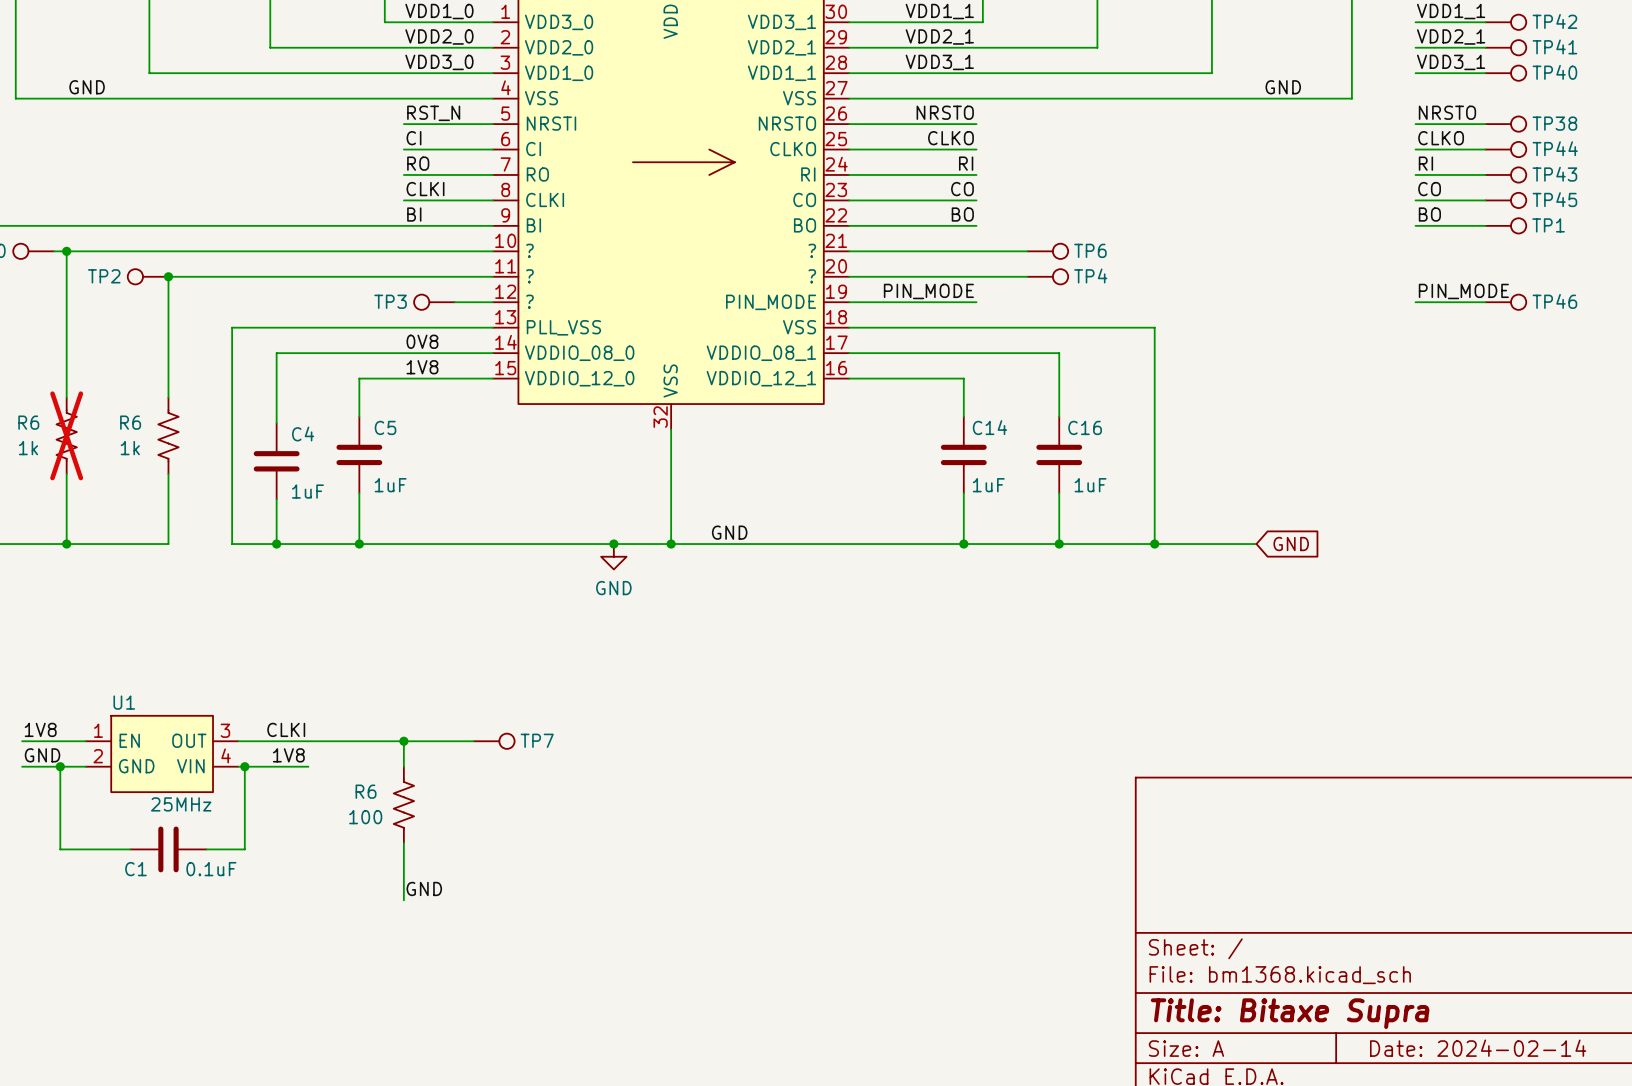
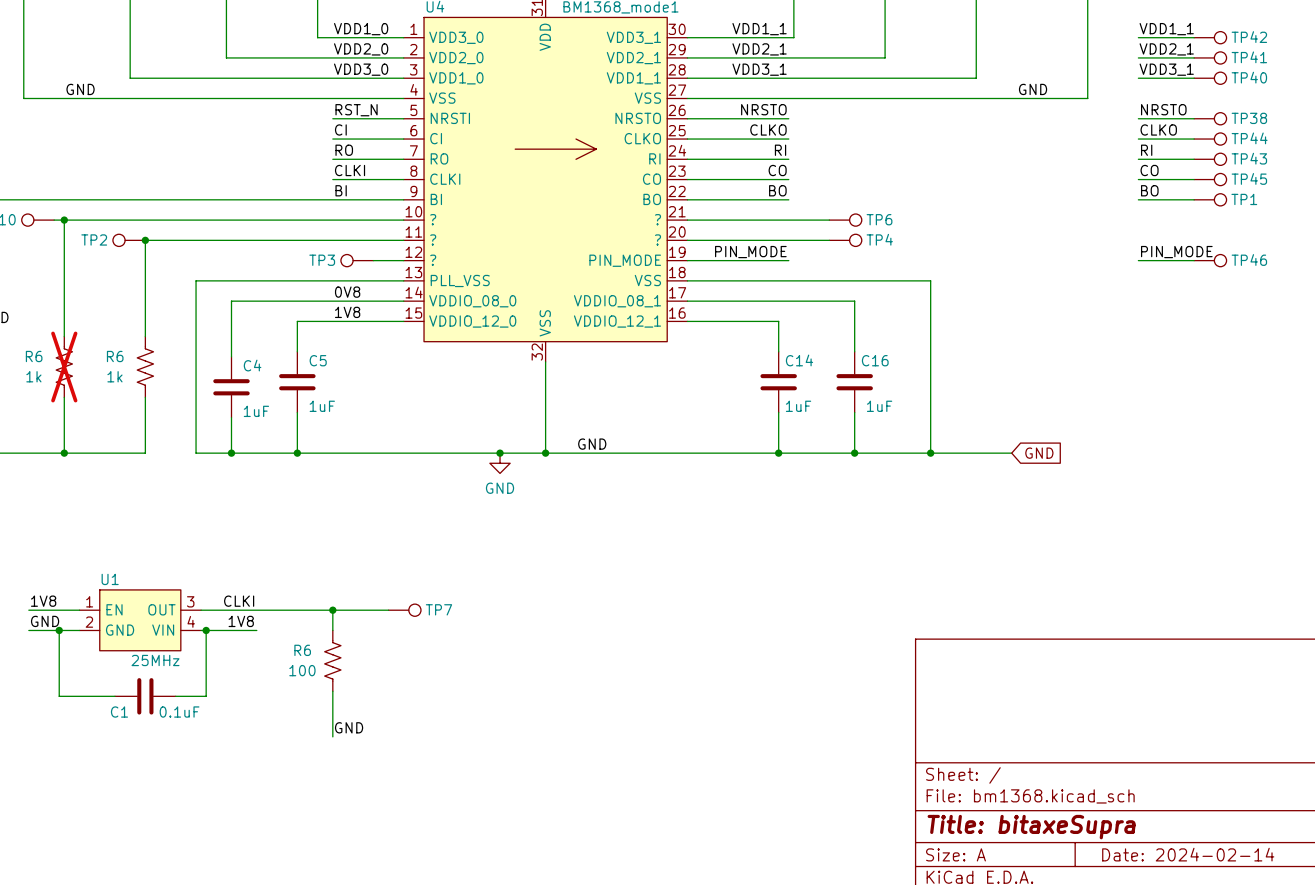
title block: Title: Bitaxe Supra (1290, 1013) -> Title: bitaxeSupra (1031, 827)

